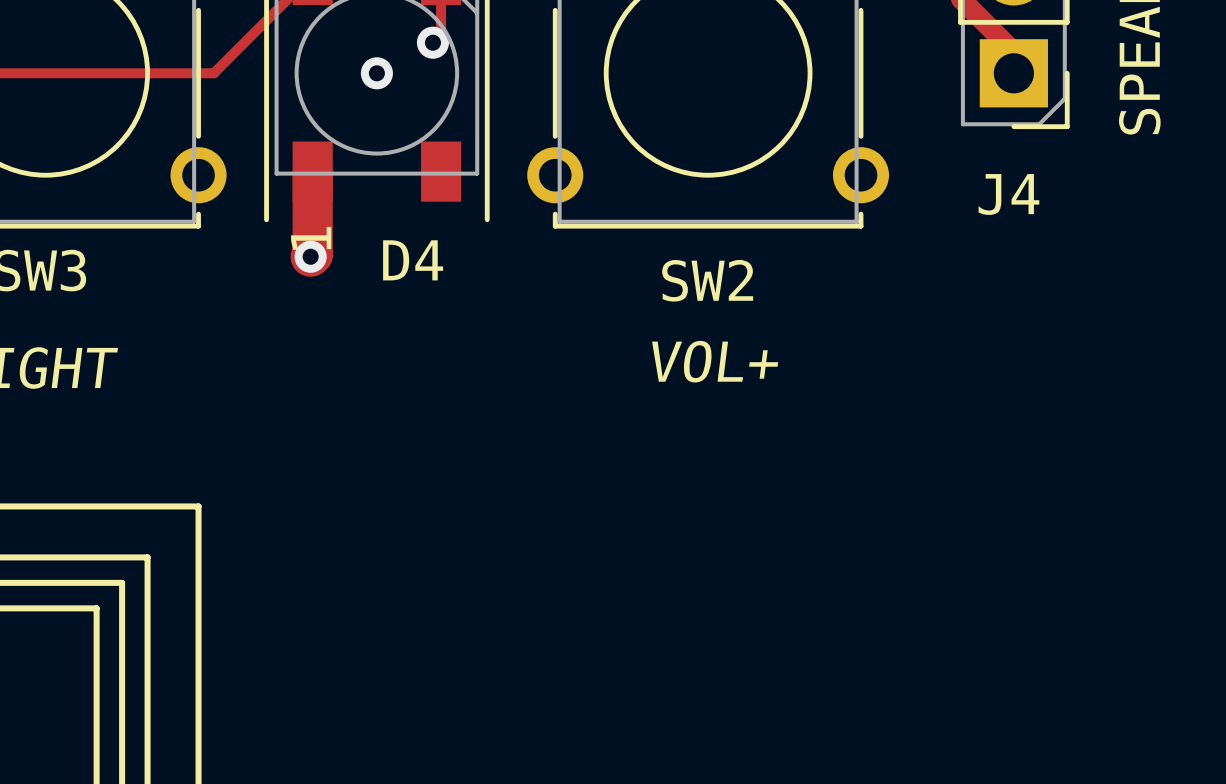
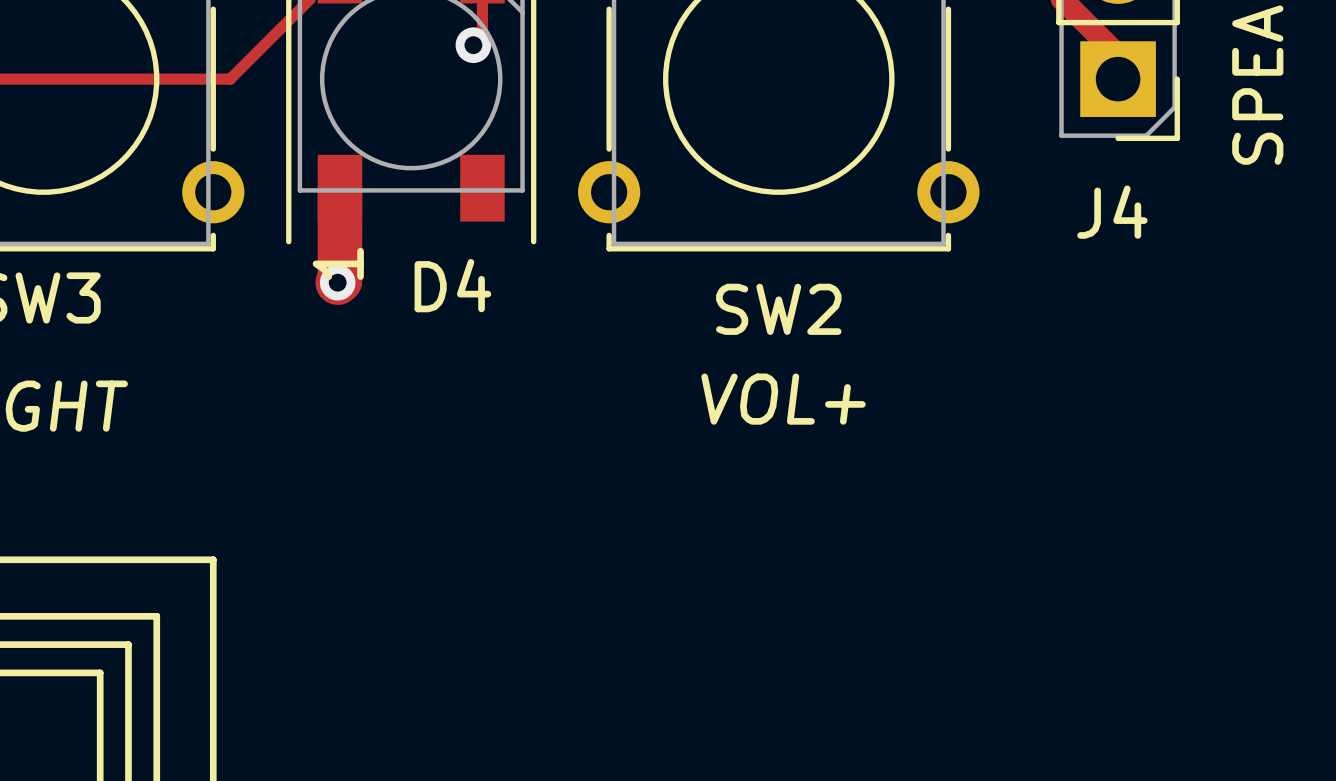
via: (376, 73) -> none

